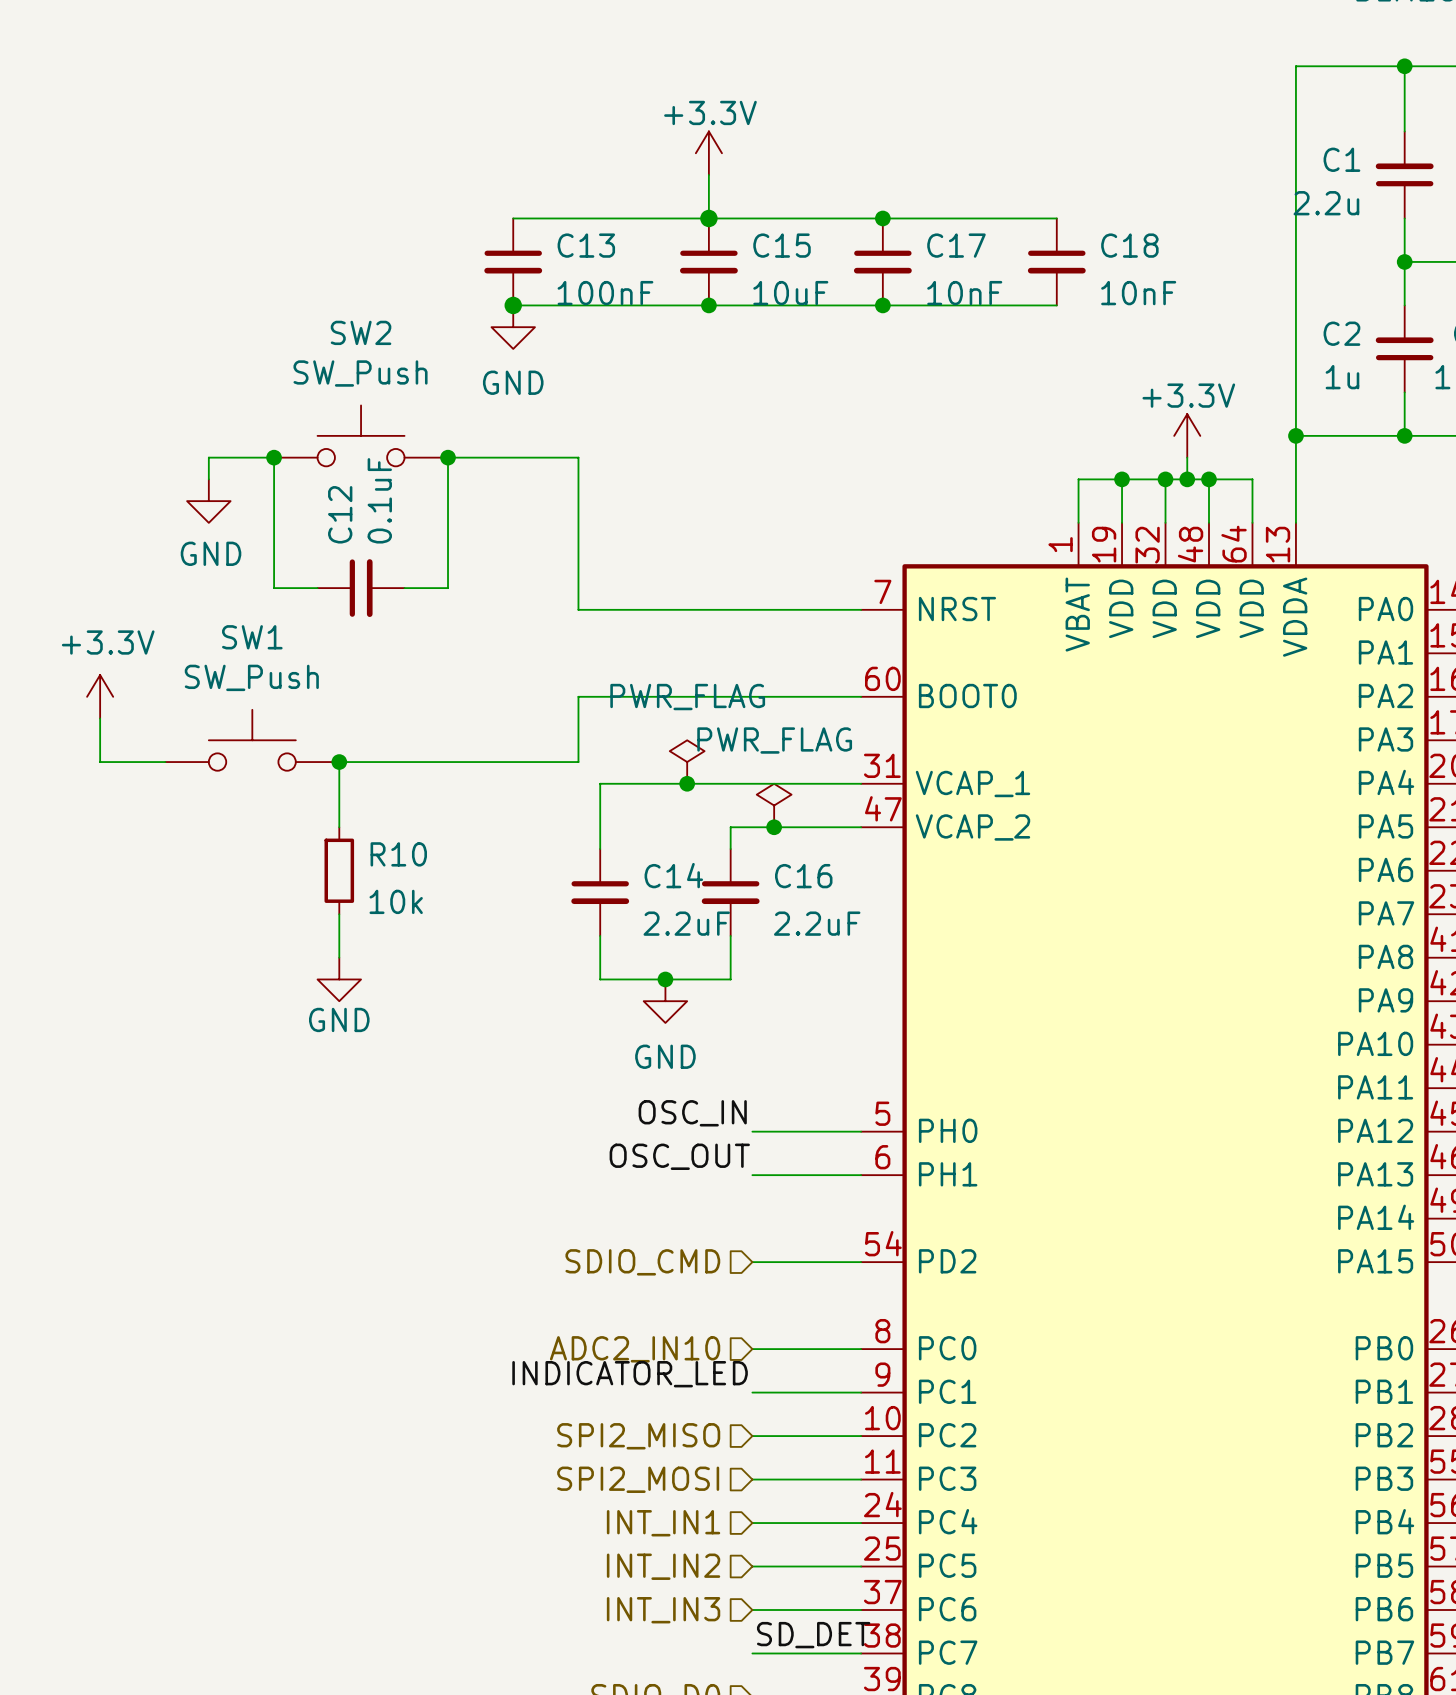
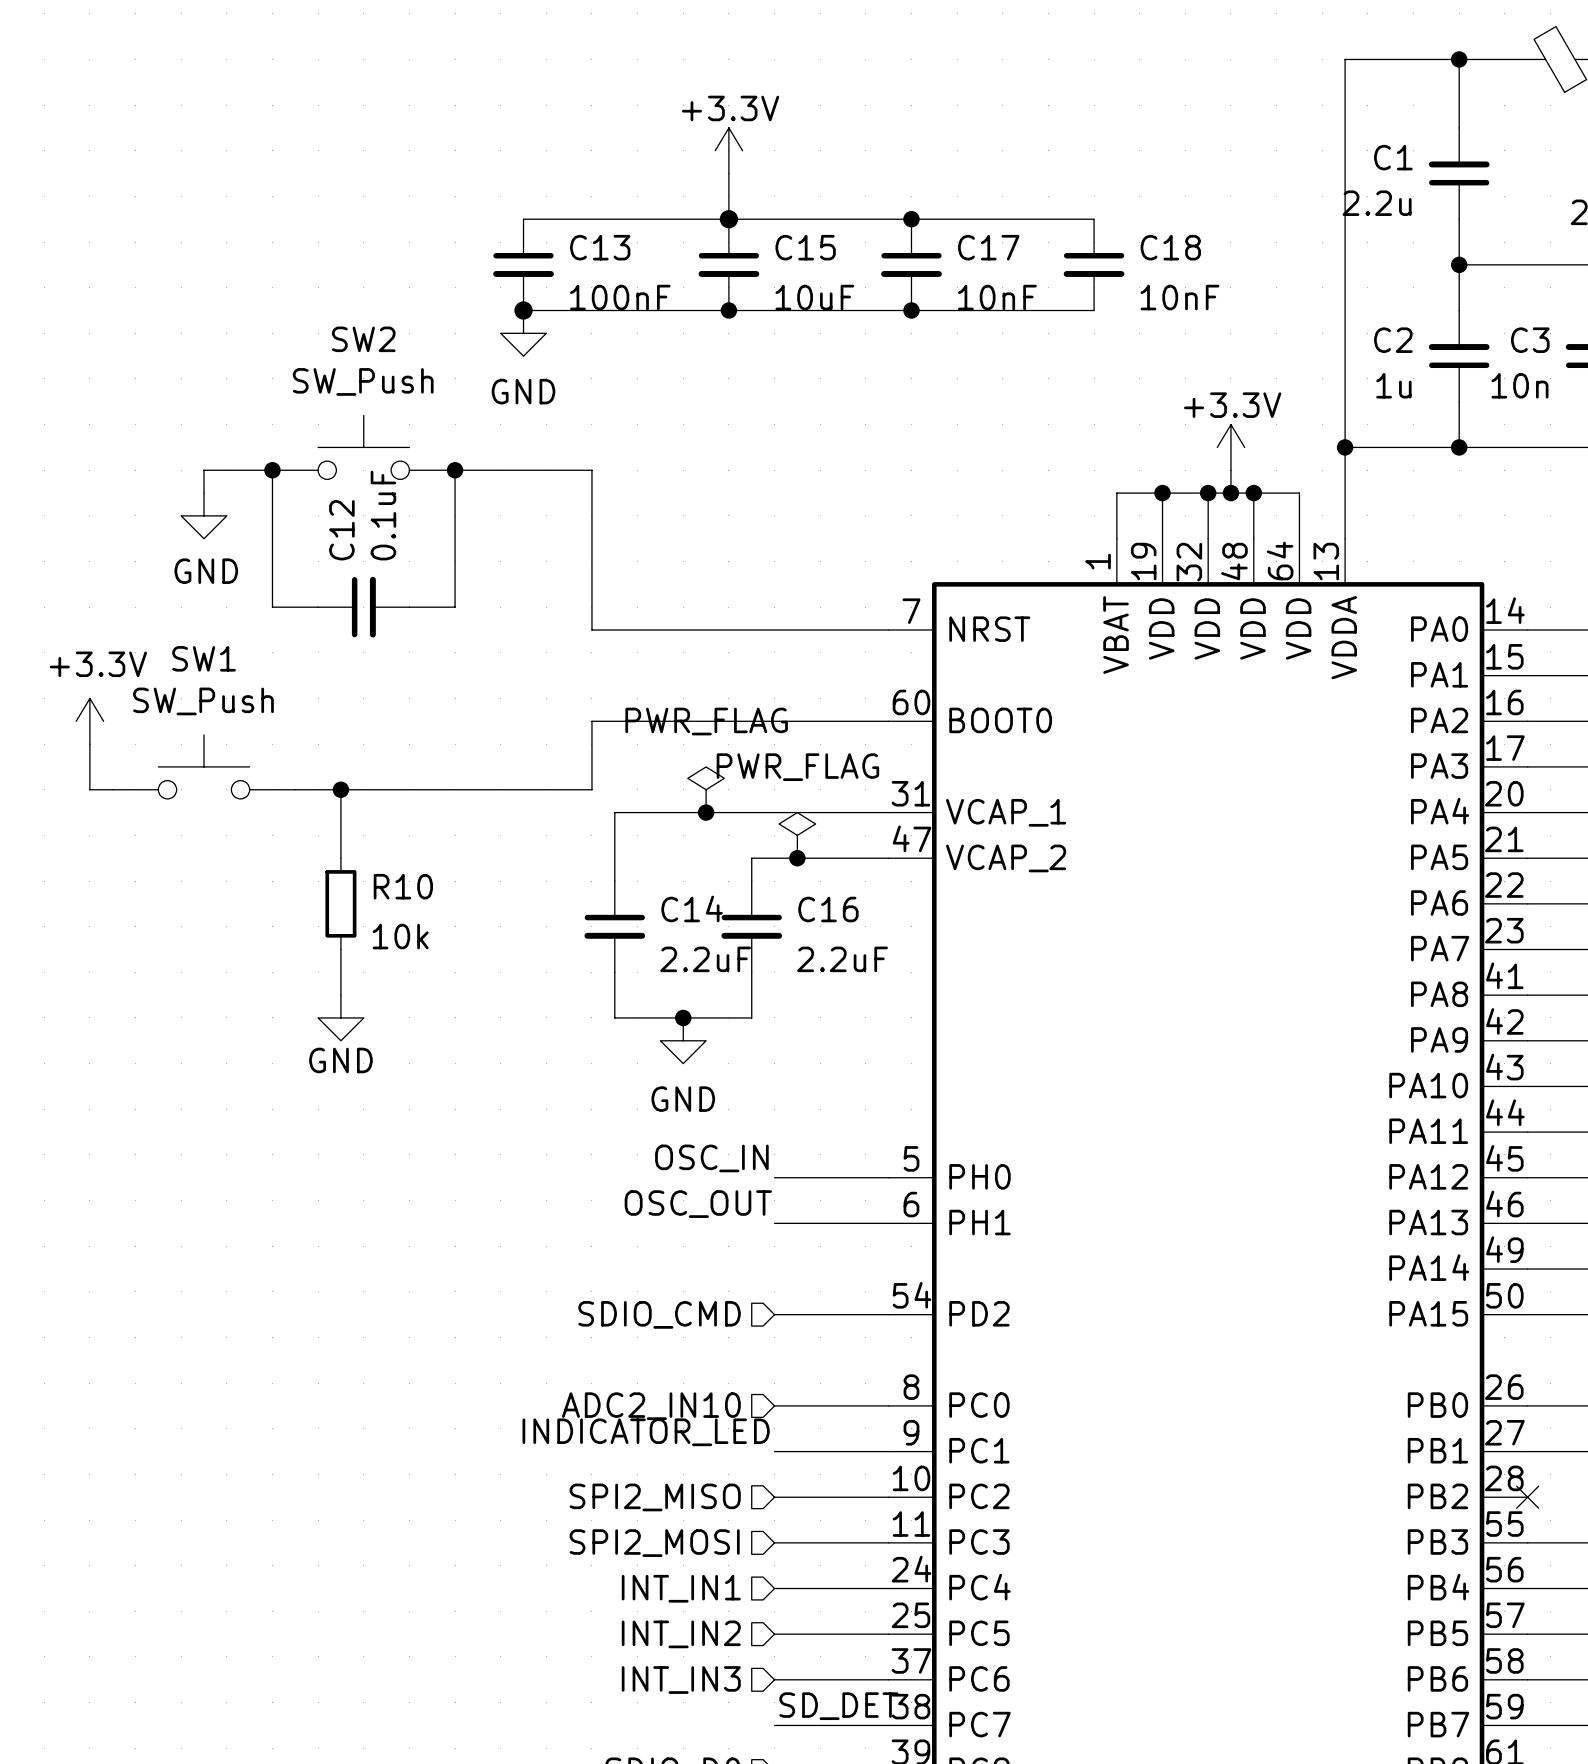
SW1 position: (252, 740) -> (204, 766)

